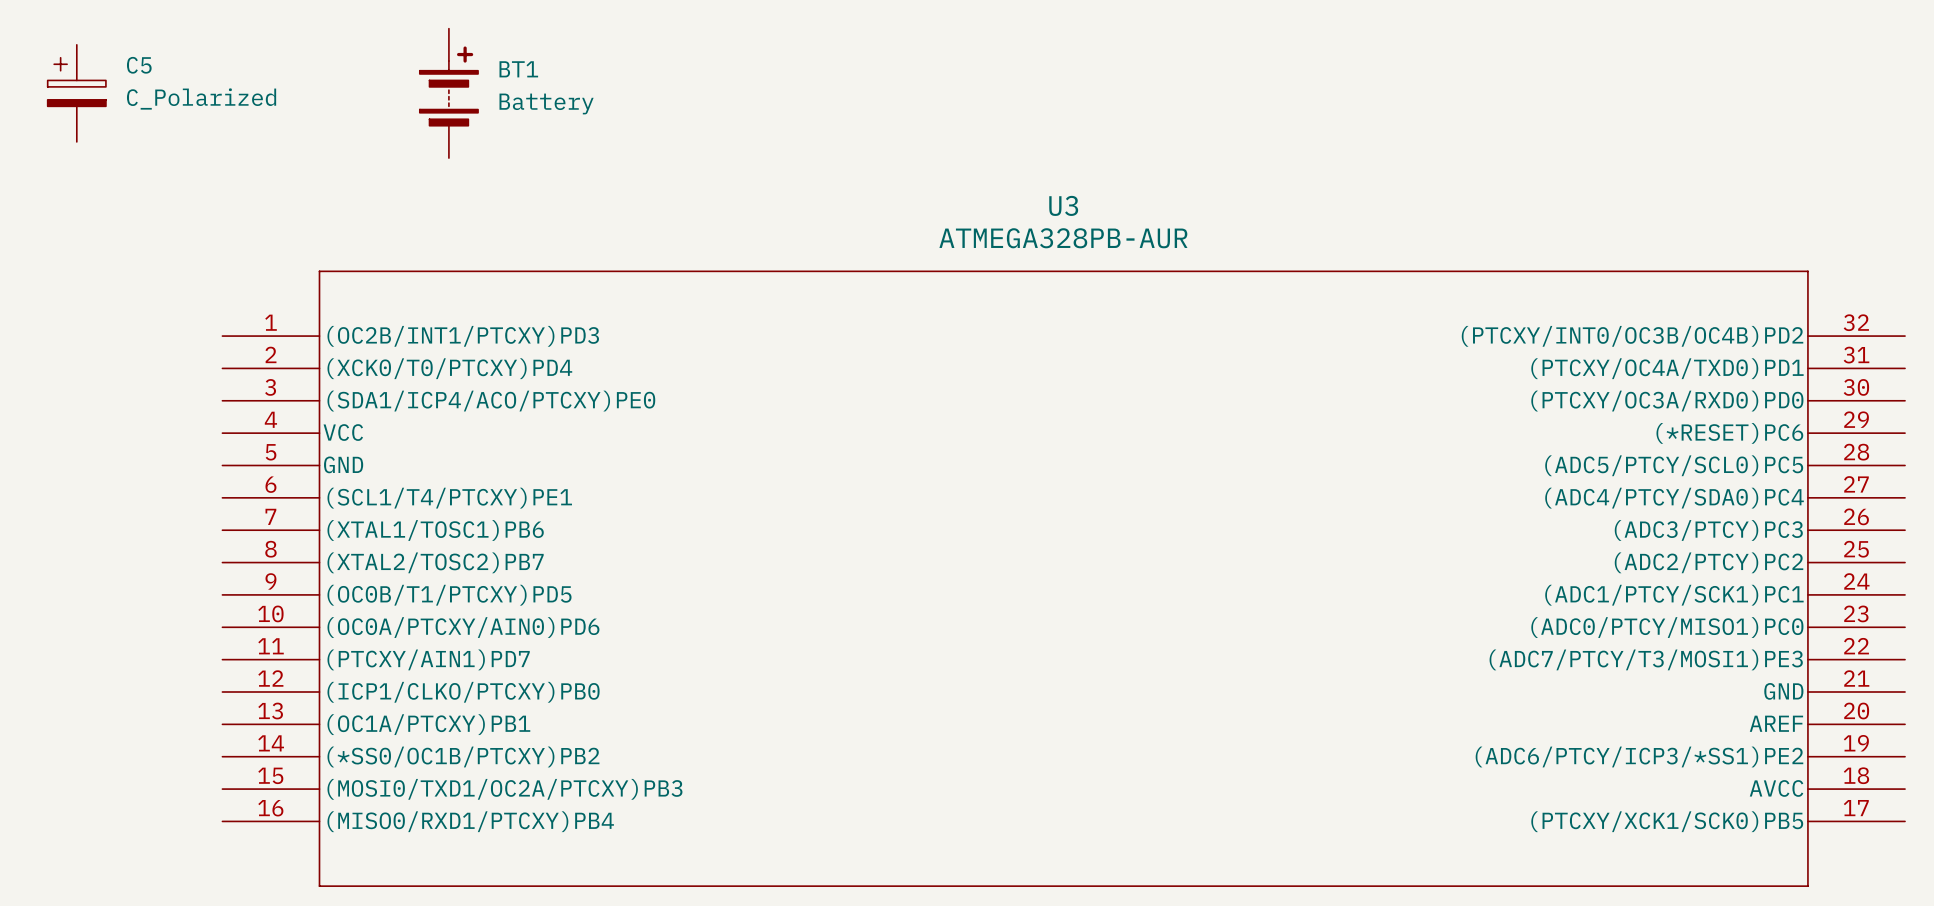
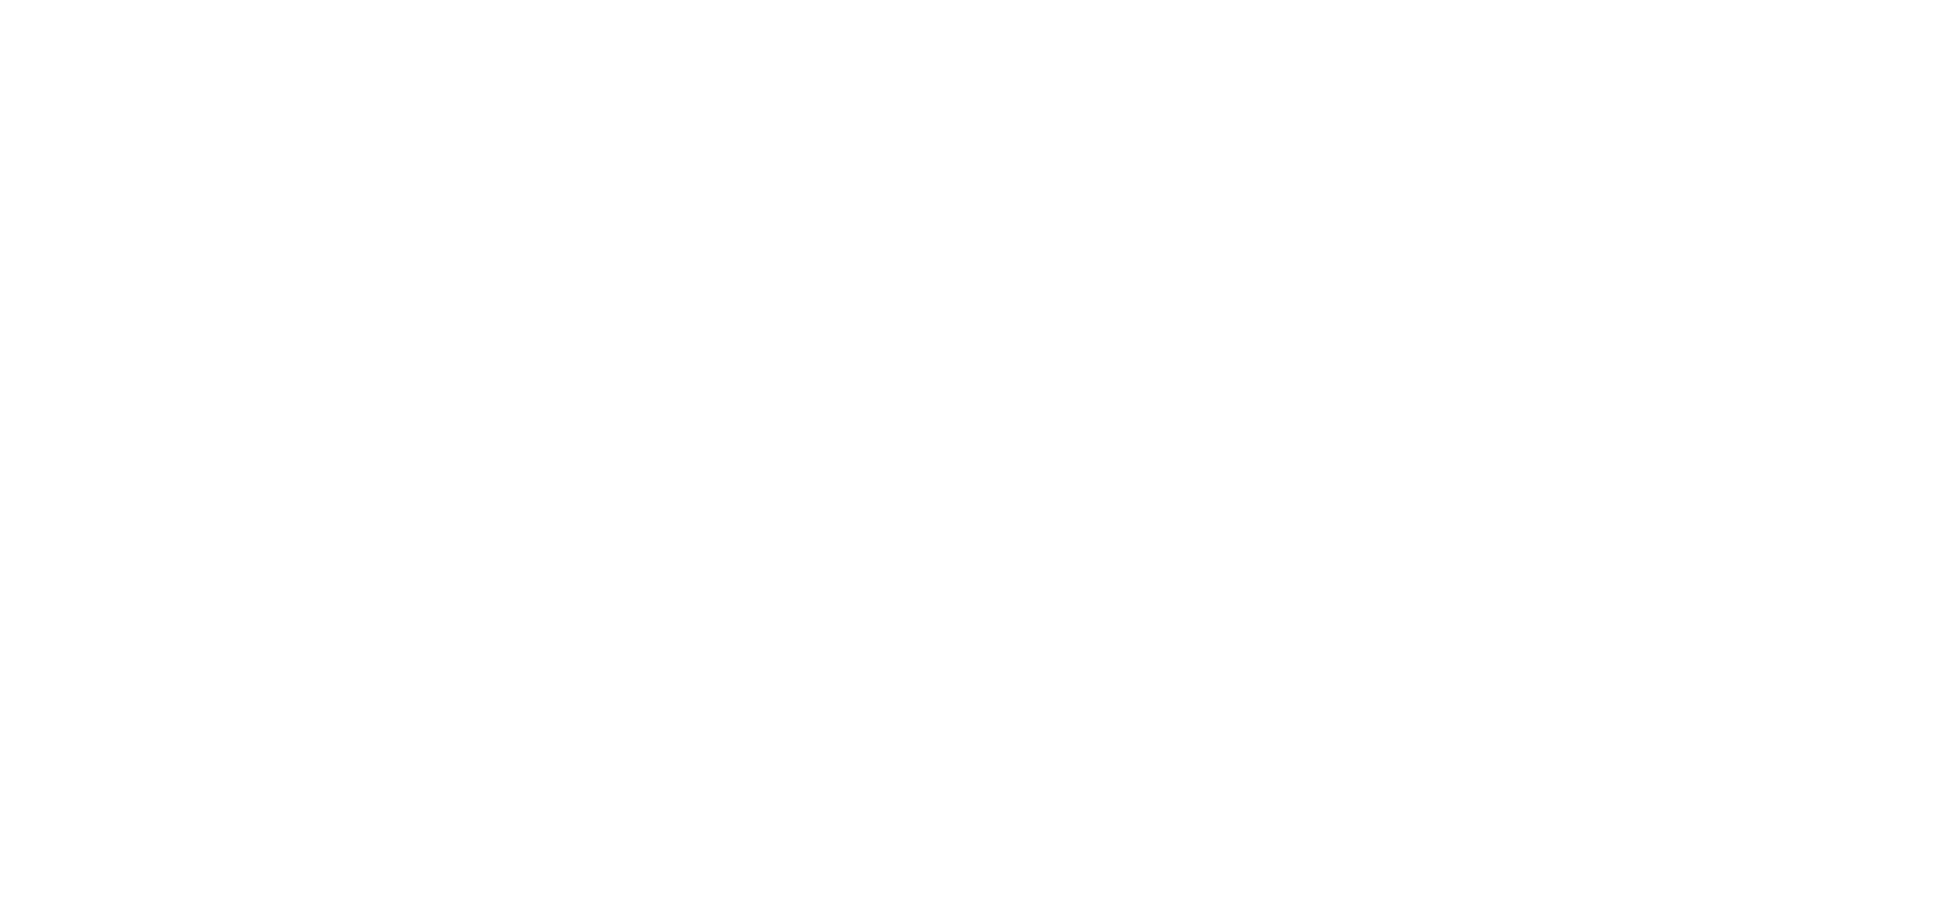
C5: C_Polarized (76, 93) -> none
BT1: Battery (448, 93) -> none
U3: ATMEGA328PB-AUR (1063, 578) -> none

